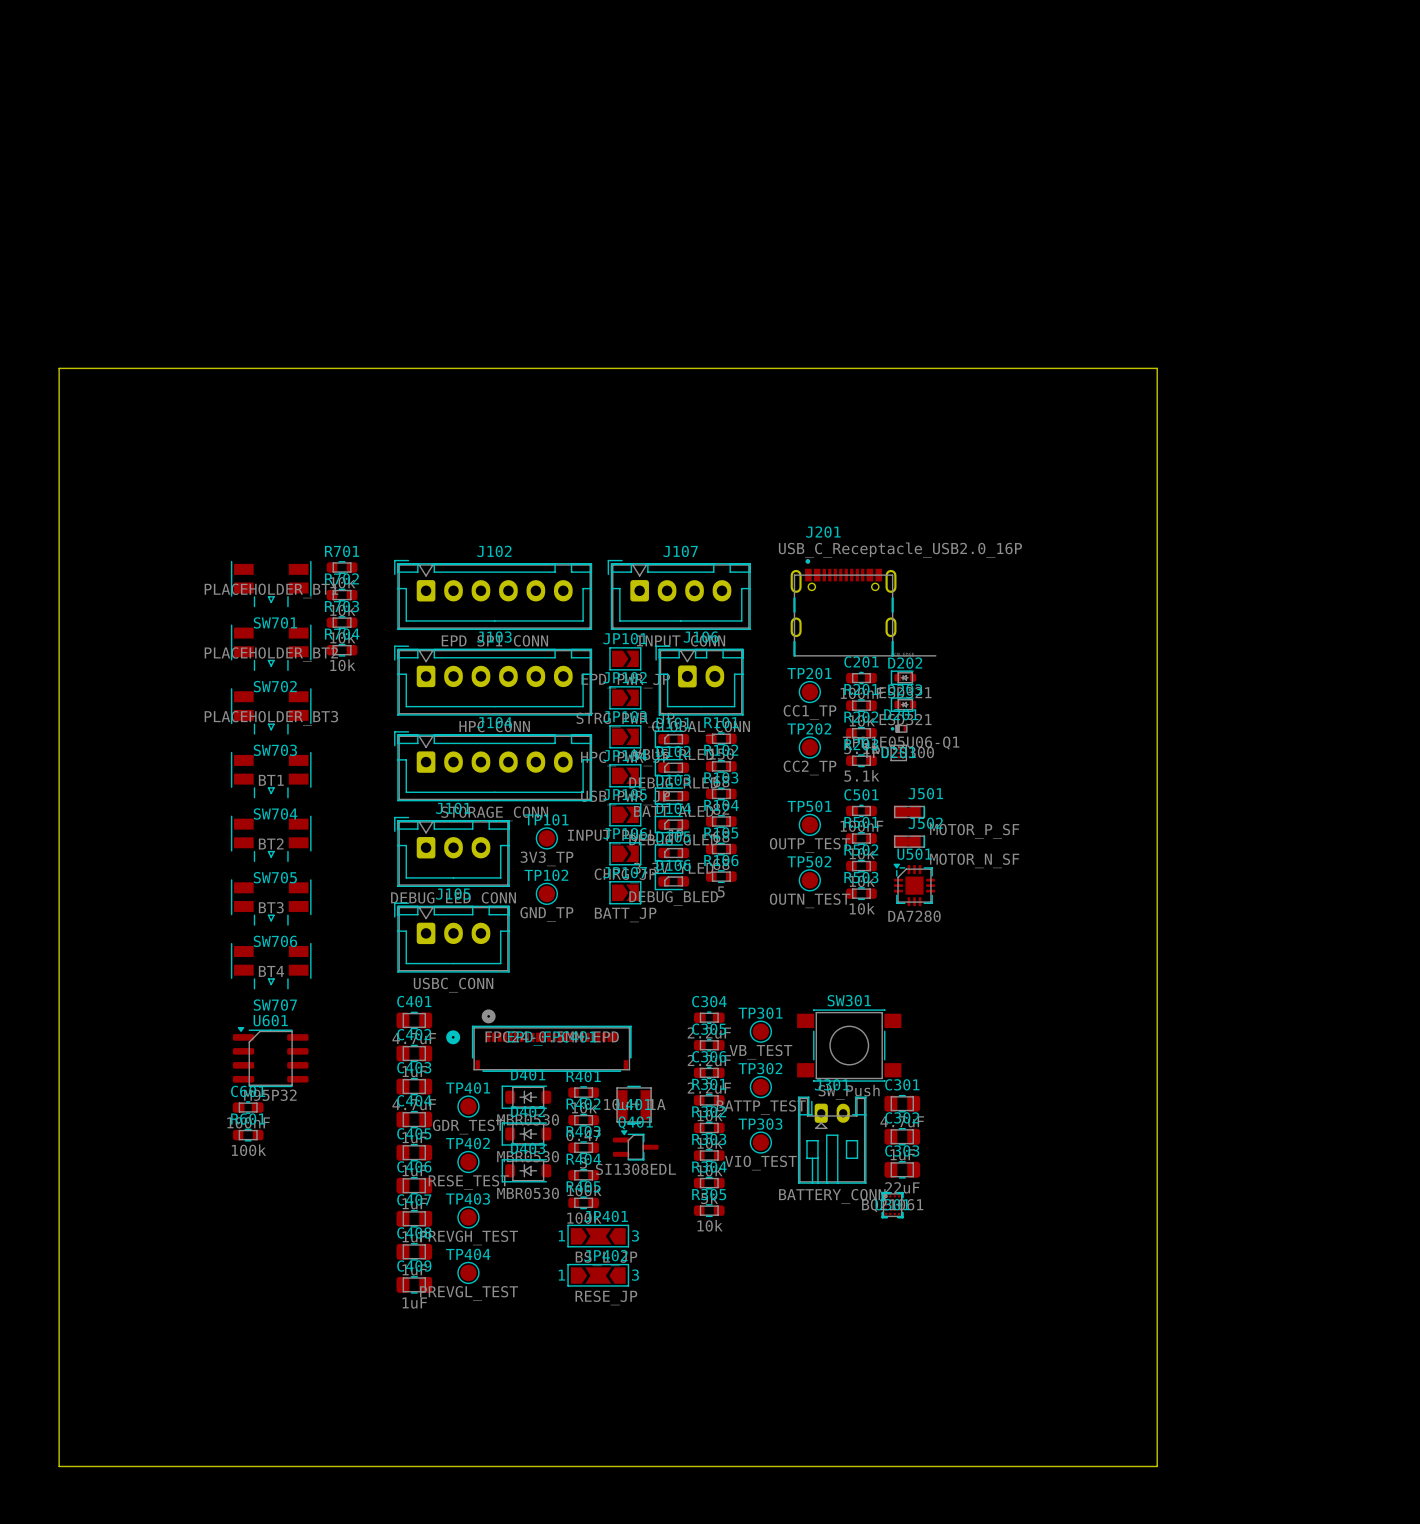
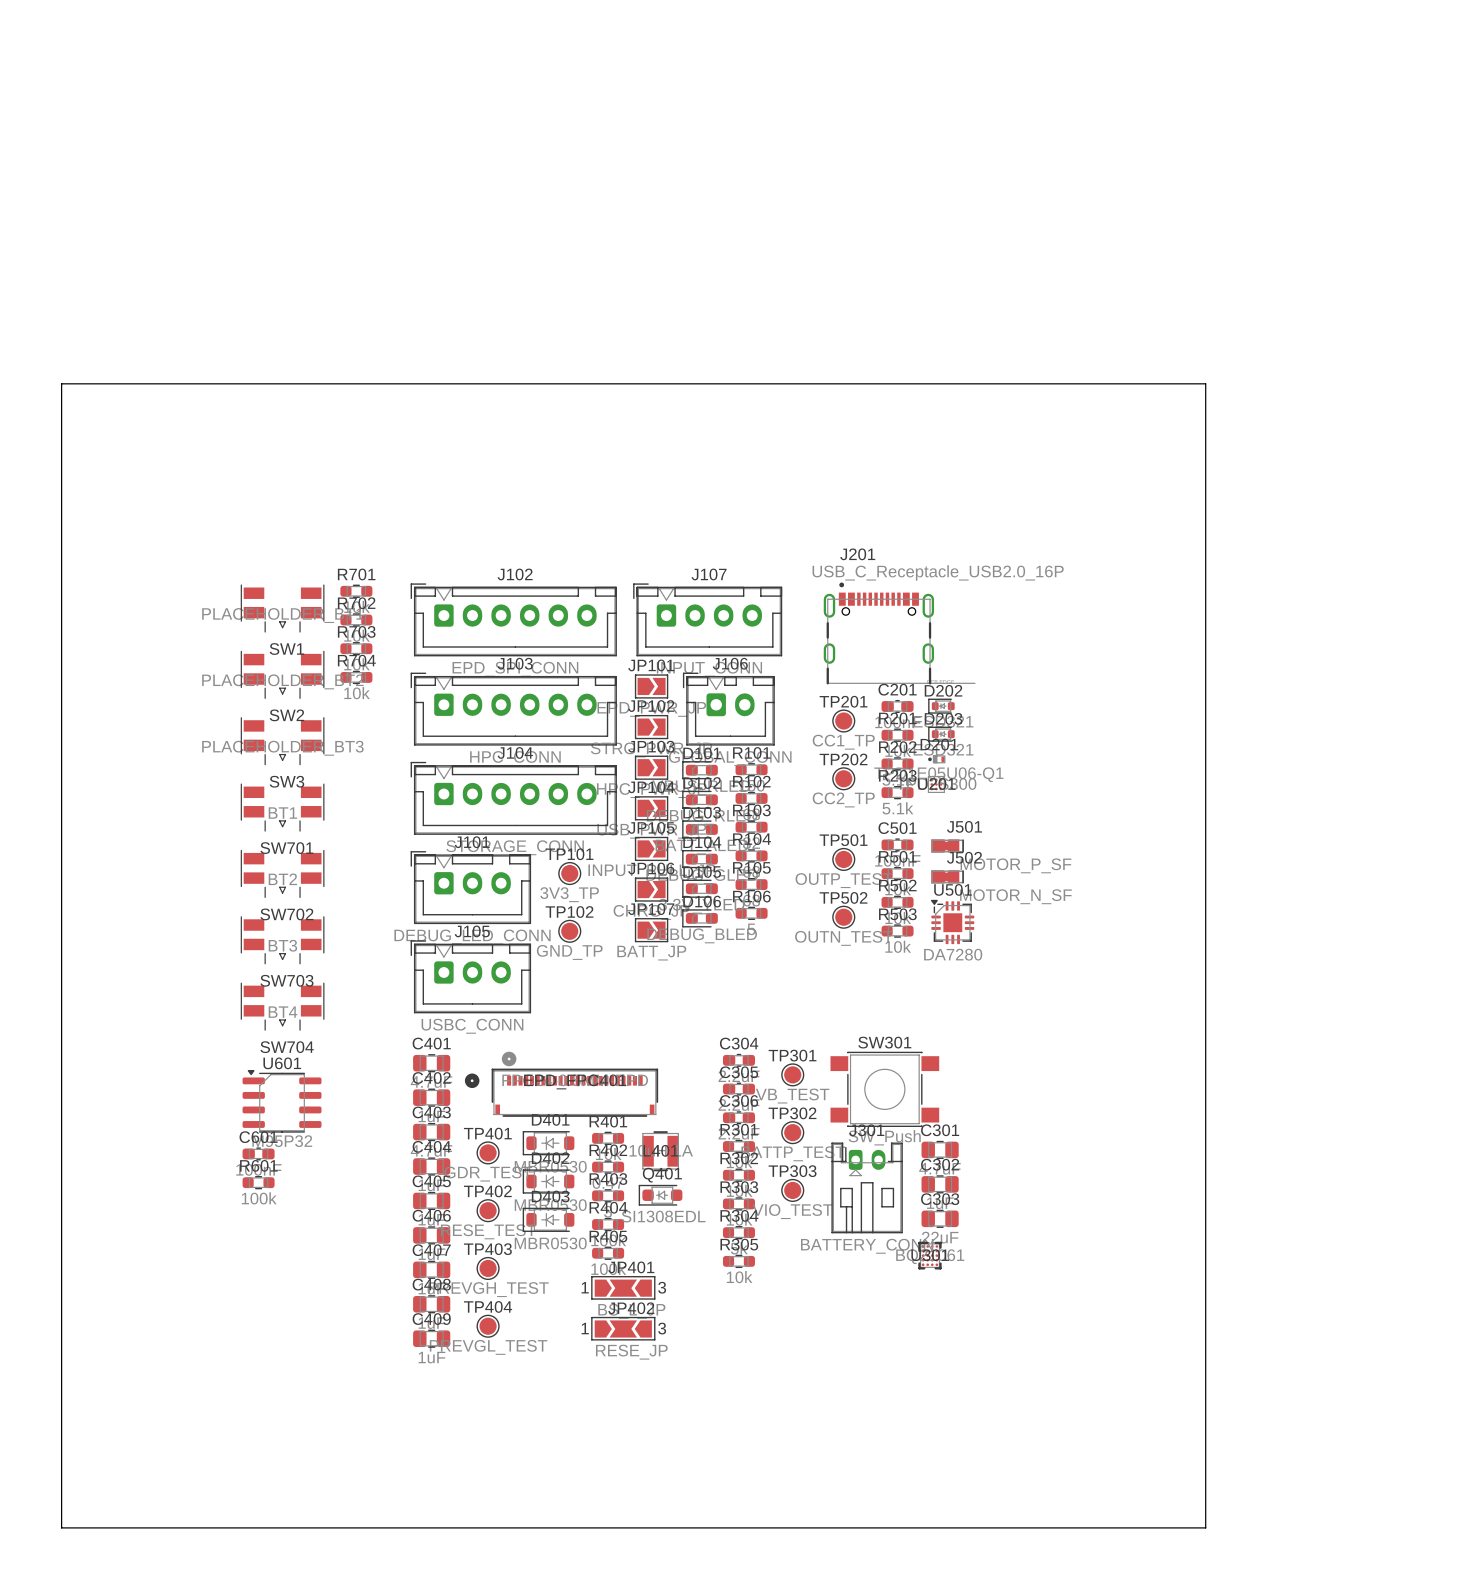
SW701 name: SW701 (275, 622) -> SW1 (286, 649)
SW702 name: SW702 (275, 686) -> SW2 (286, 715)
SW703 name: SW703 (275, 750) -> SW3 (286, 781)
SW704 name: SW704 (275, 813) -> SW701 (286, 848)
SW705 name: SW705 (275, 877) -> SW702 (286, 914)
SW706 name: SW706 (275, 941) -> SW703 (286, 980)
SW707 name: SW707 (275, 1005) -> SW704 (287, 1047)
Q401 footprint: [612, 1130, 659, 1161] -> [638, 1184, 683, 1206]

